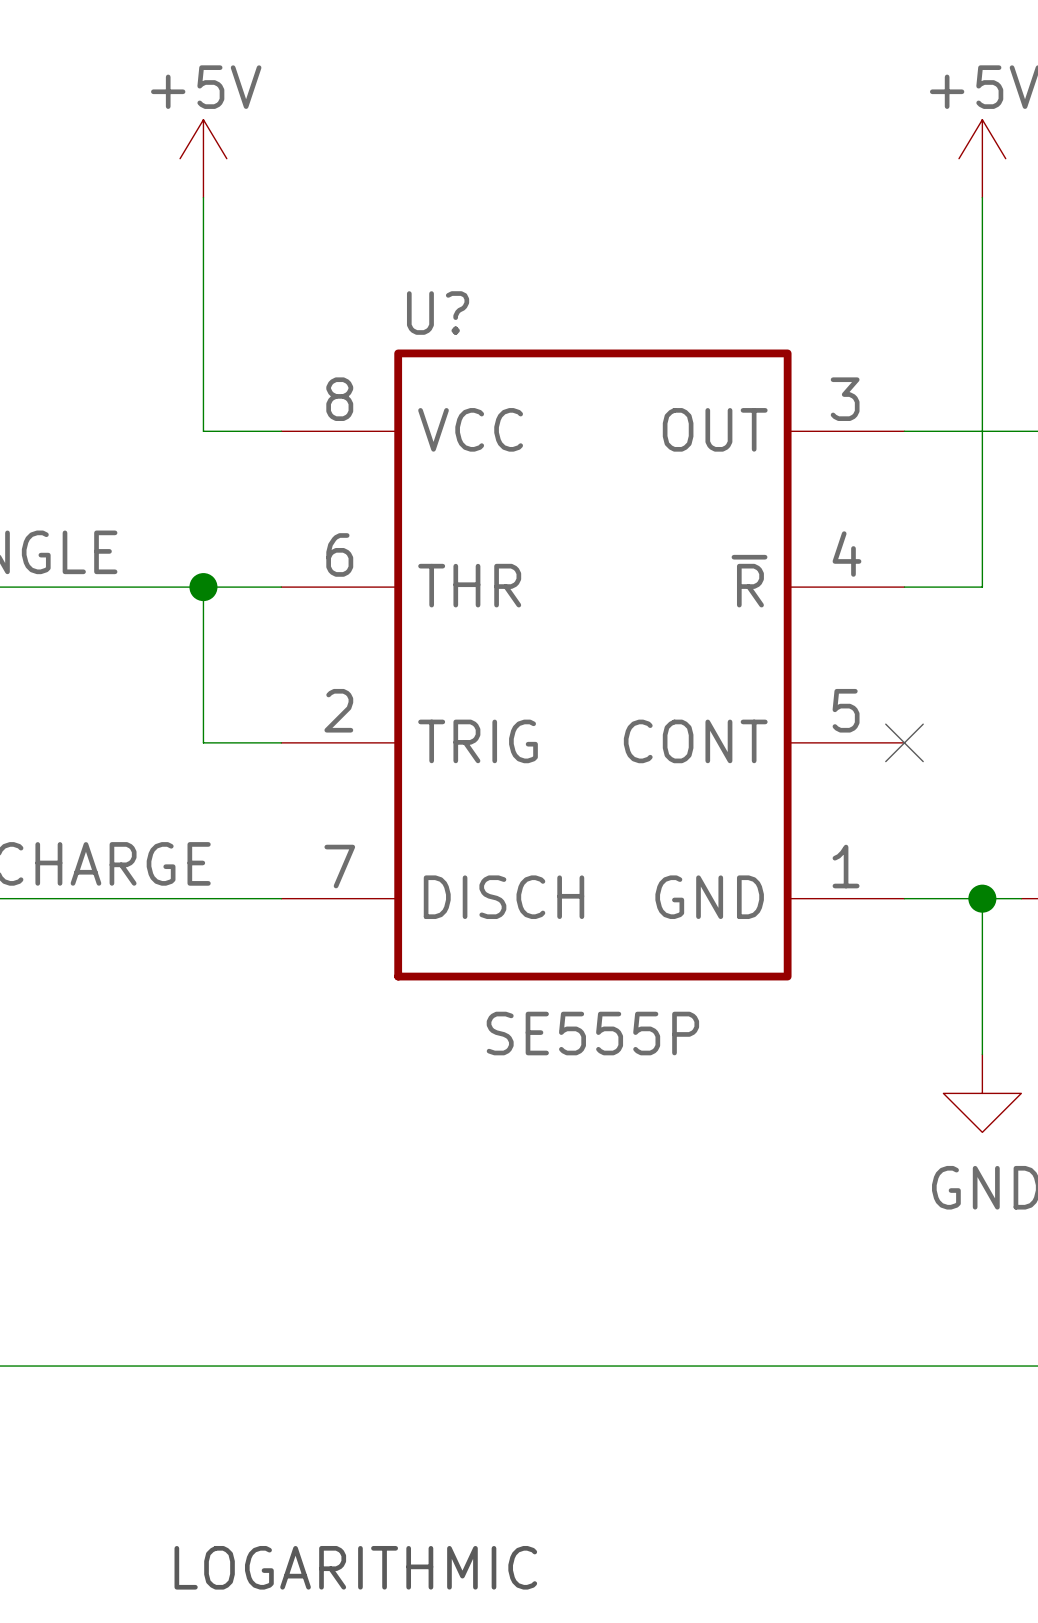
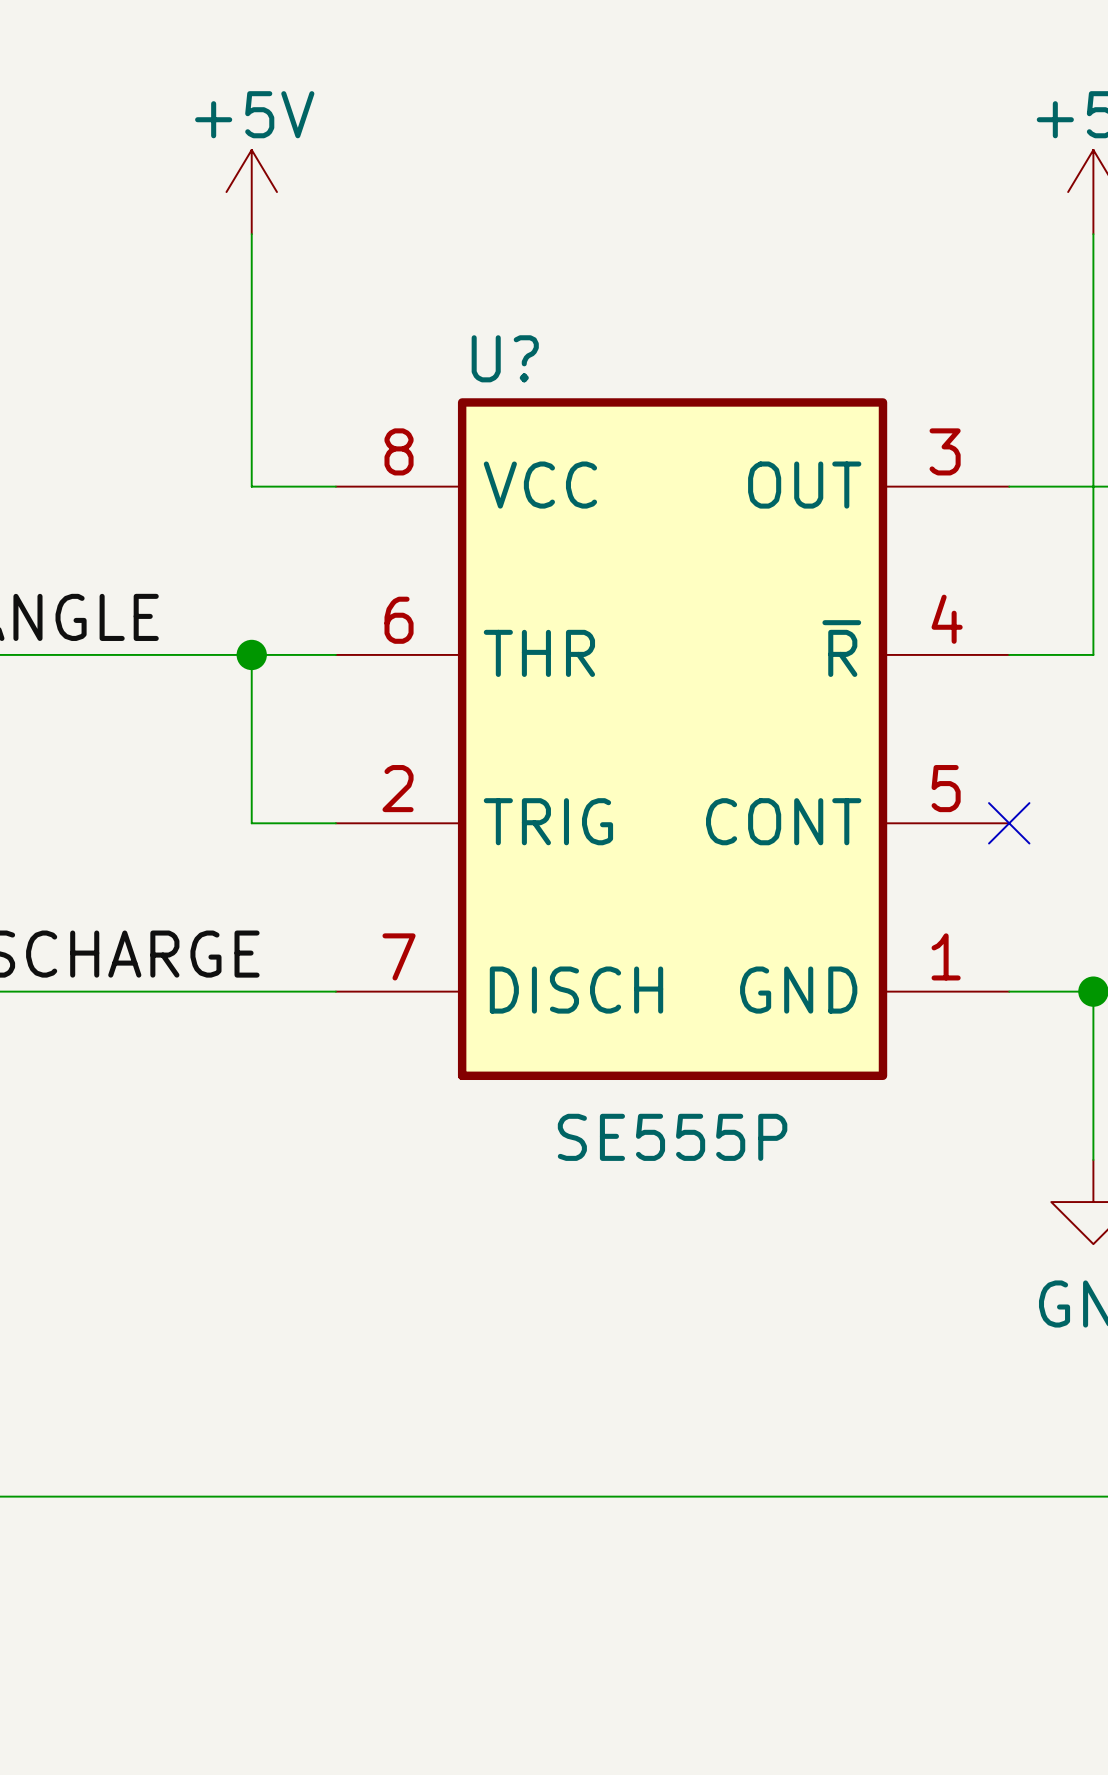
text: LOGARITHMIC (355, 1567) -> none

